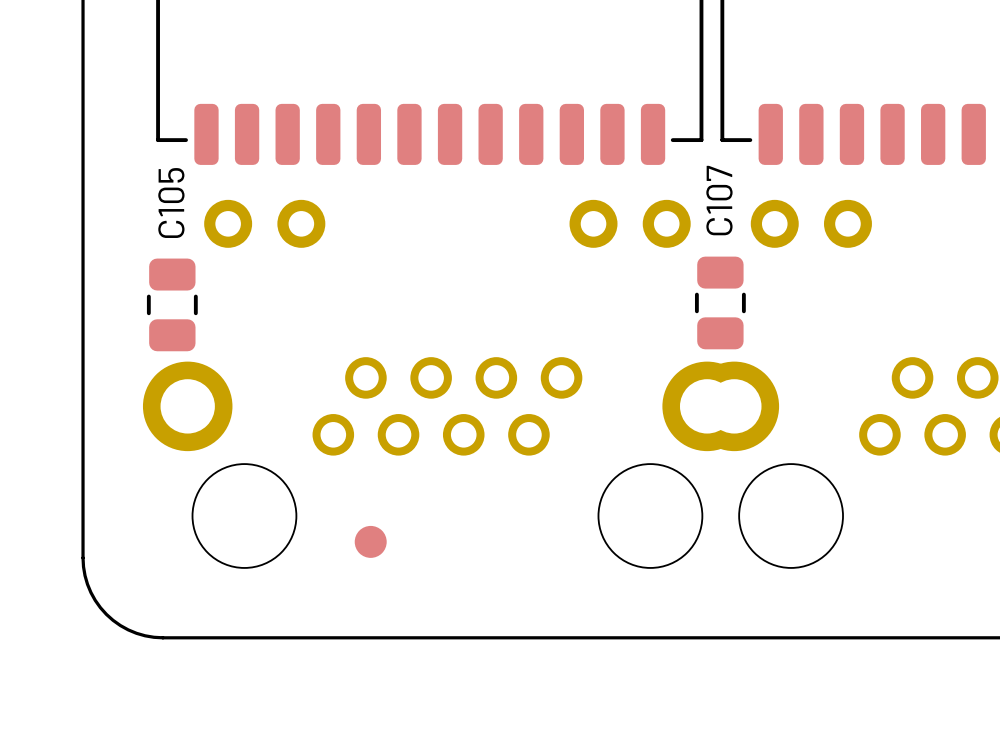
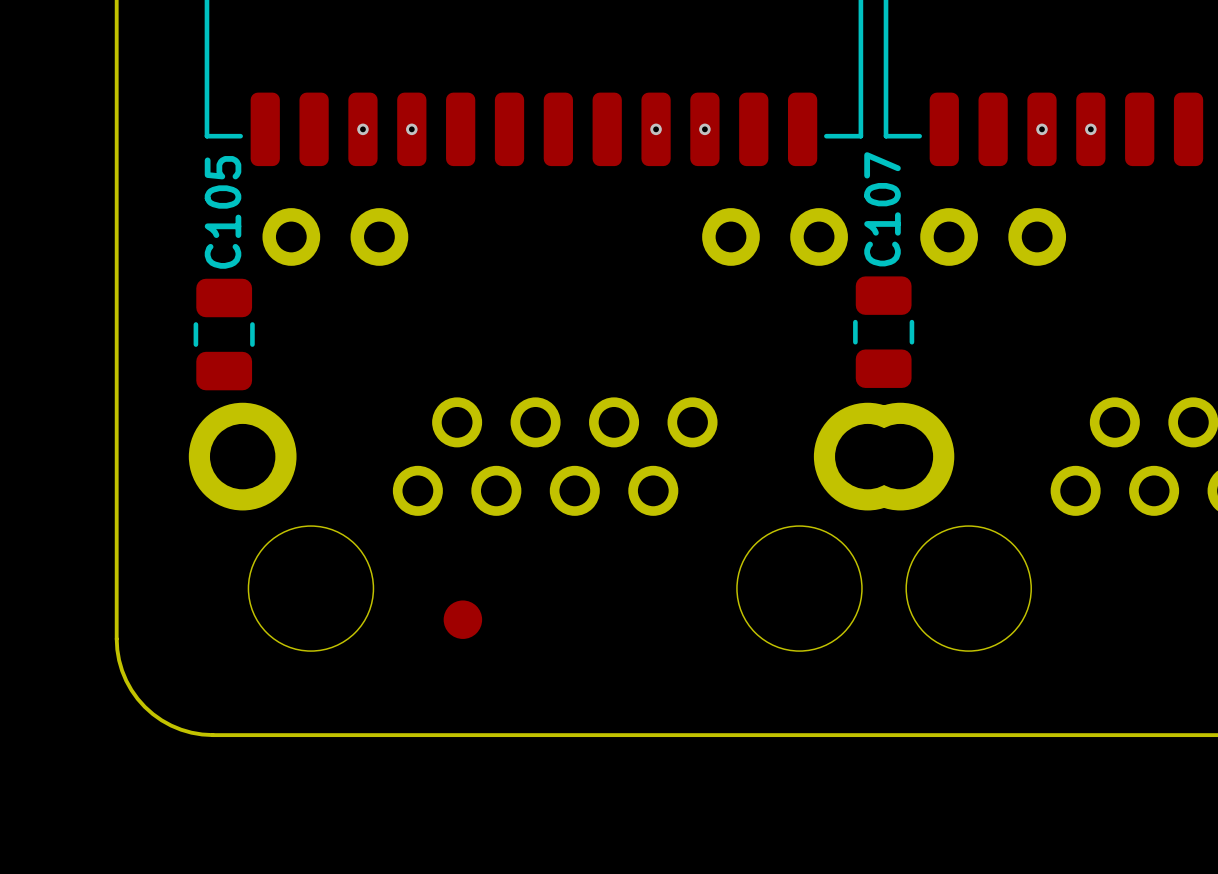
via: none -> (362, 129)
via: none -> (411, 129)
via: none -> (656, 129)
via: none -> (704, 129)
via: none -> (1041, 129)
via: none -> (1090, 129)

